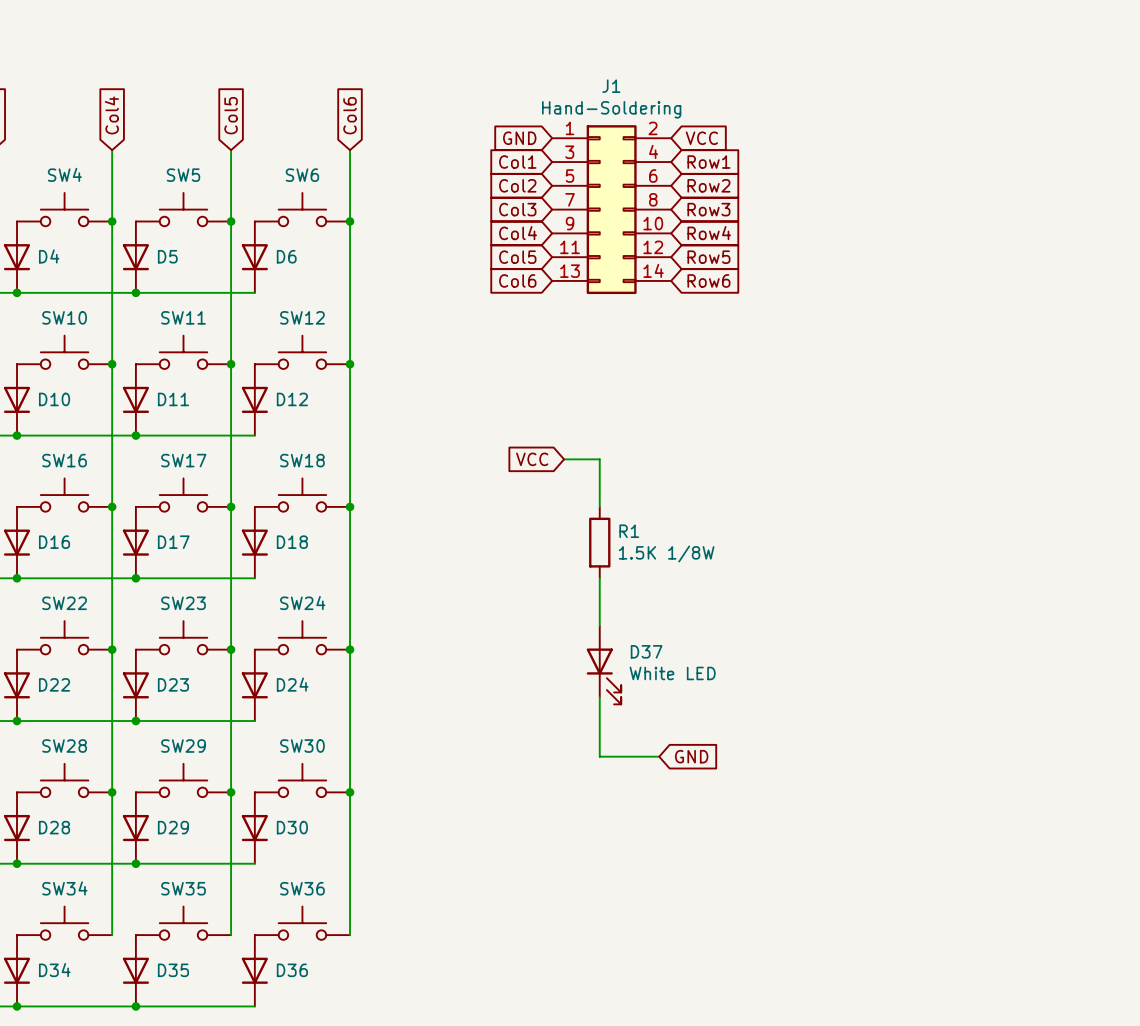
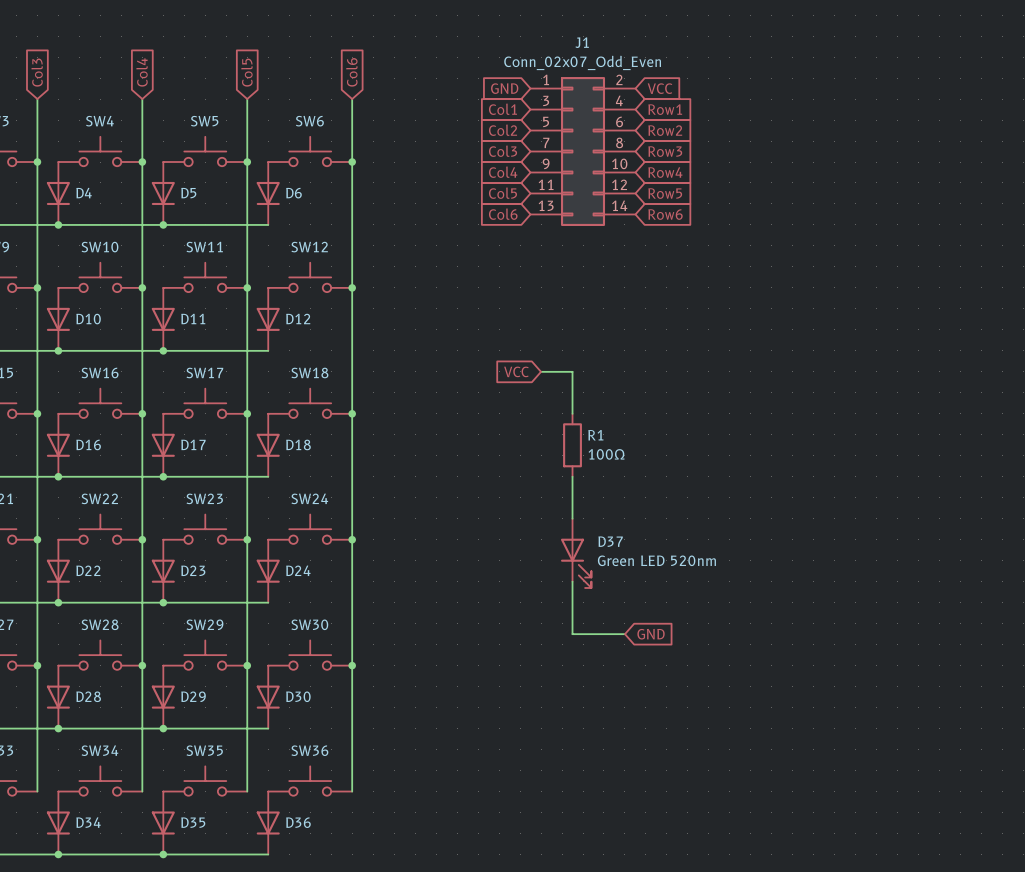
J1 value: Hand-Soldering (611, 109) -> Conn_02x07_Odd_Even (582, 62)
R1 value: 1.5K 1/8W (666, 554) -> 100Ω (606, 454)
D37 value: White LED (672, 673) -> Green LED 520nm (656, 560)

